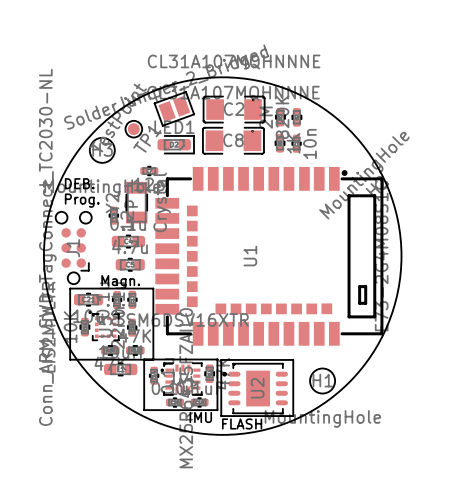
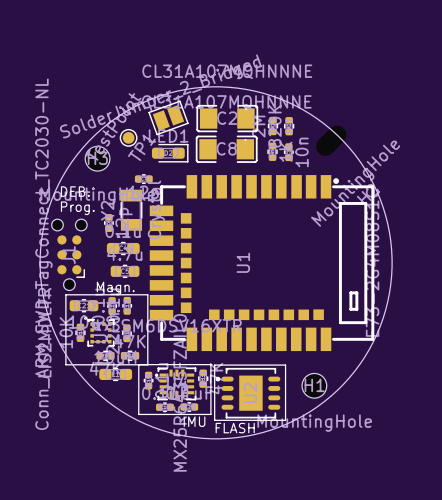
part position: (174, 402) -> (189, 407)
part position: (199, 402) -> (164, 407)

